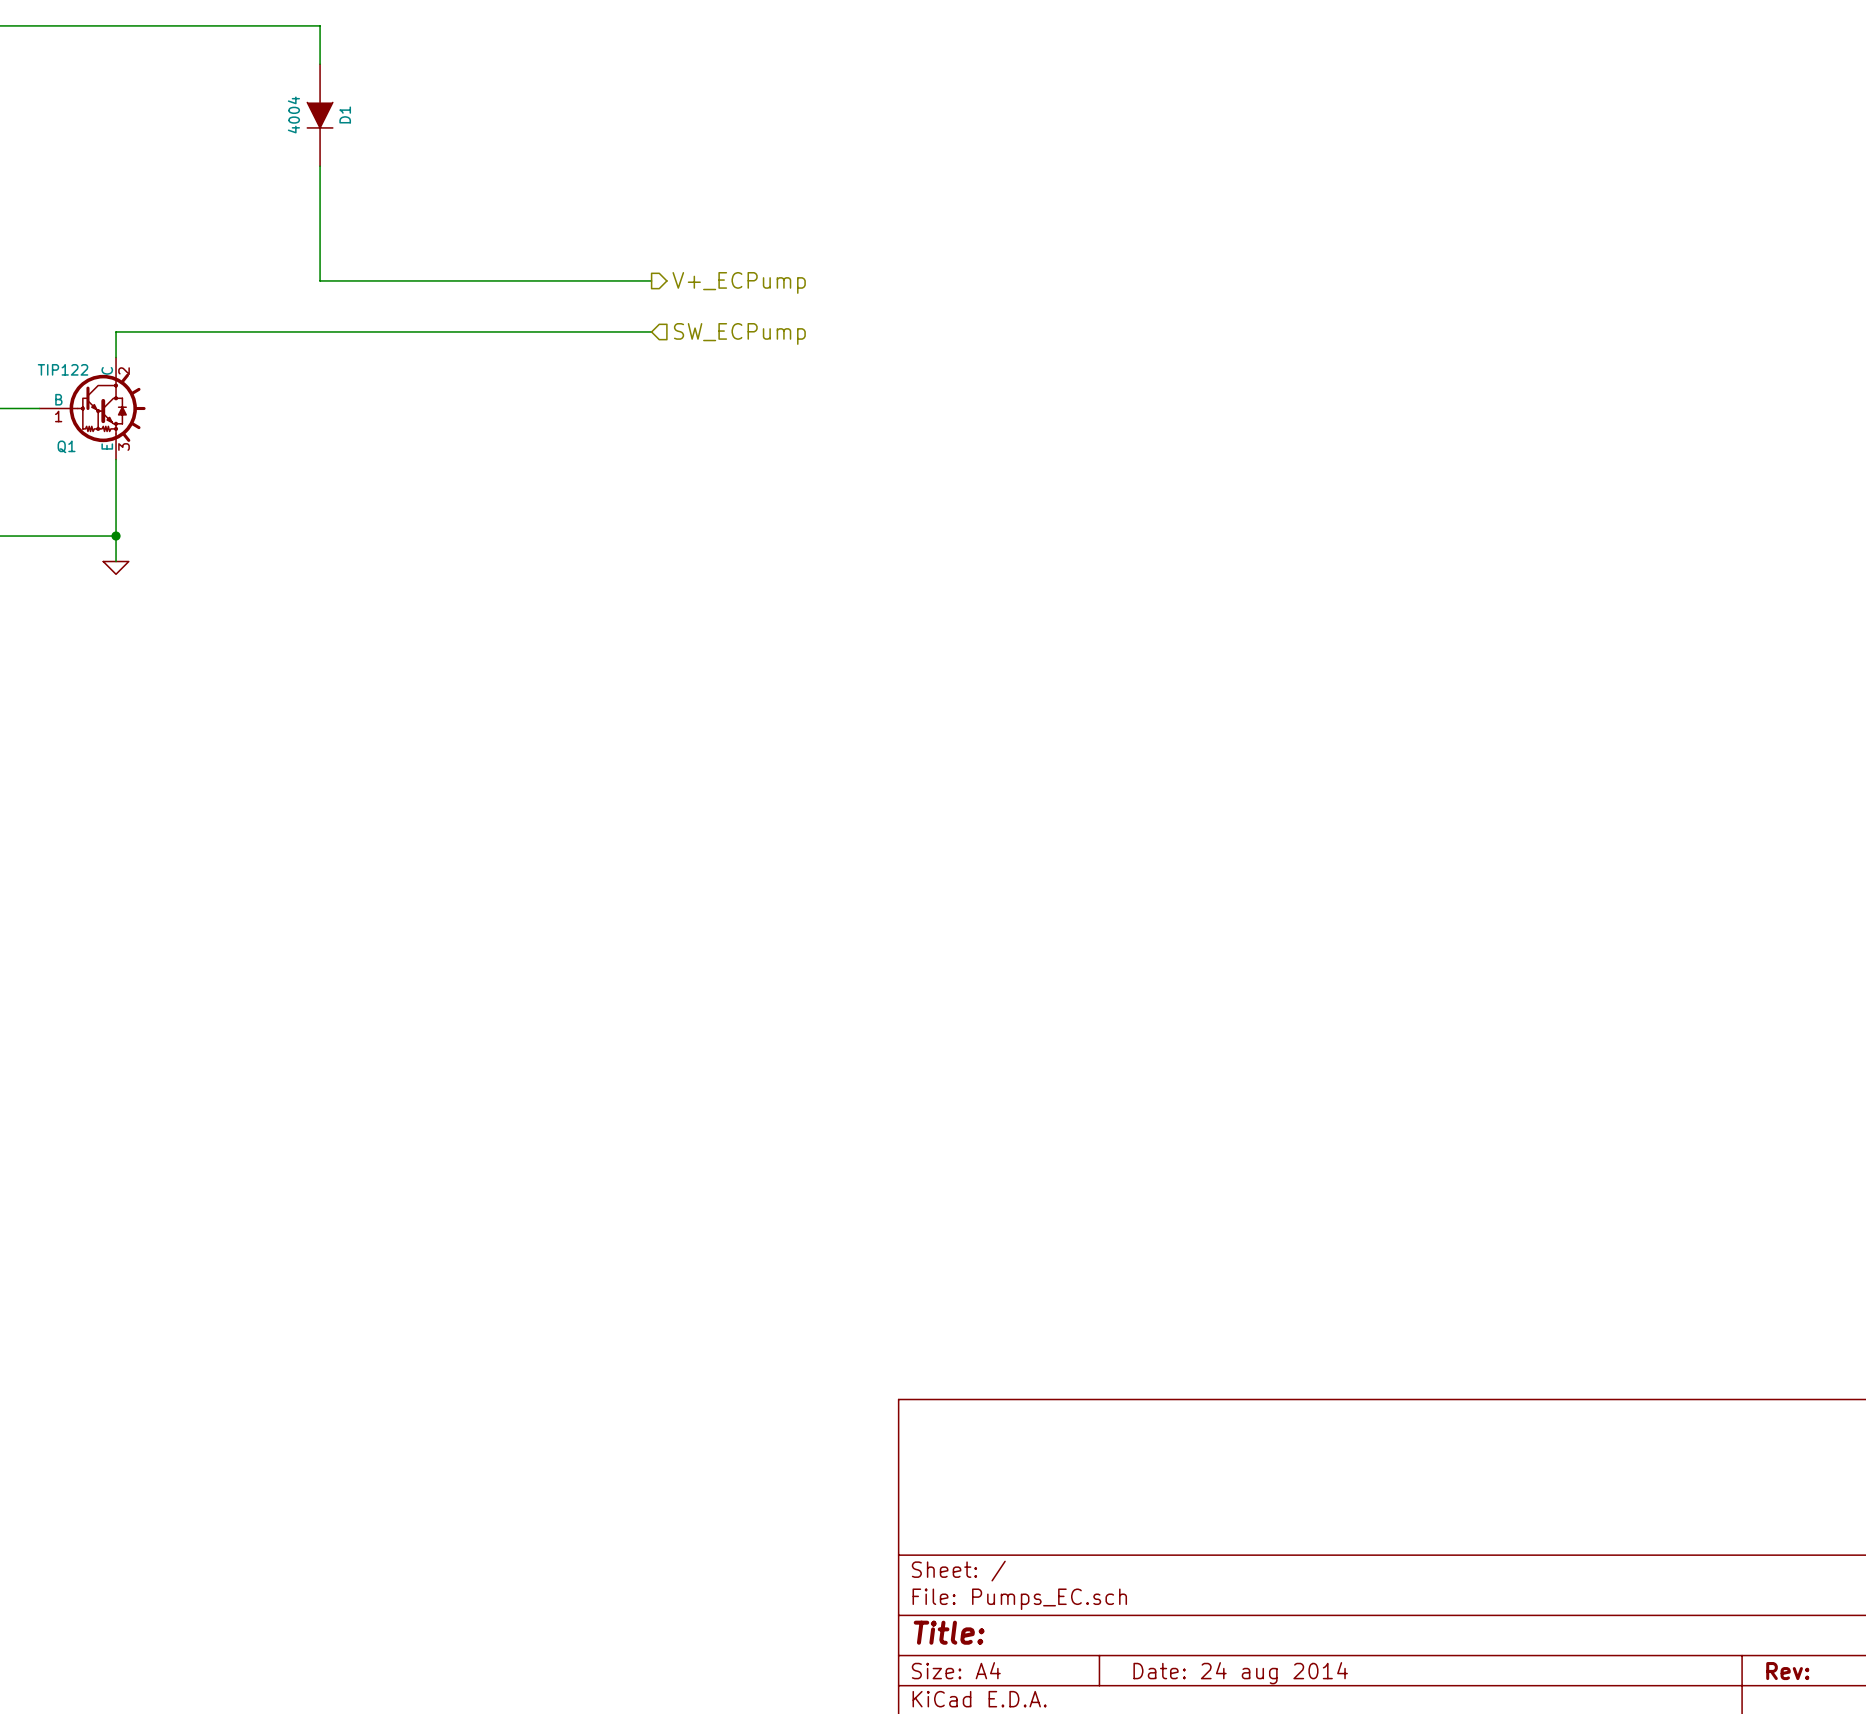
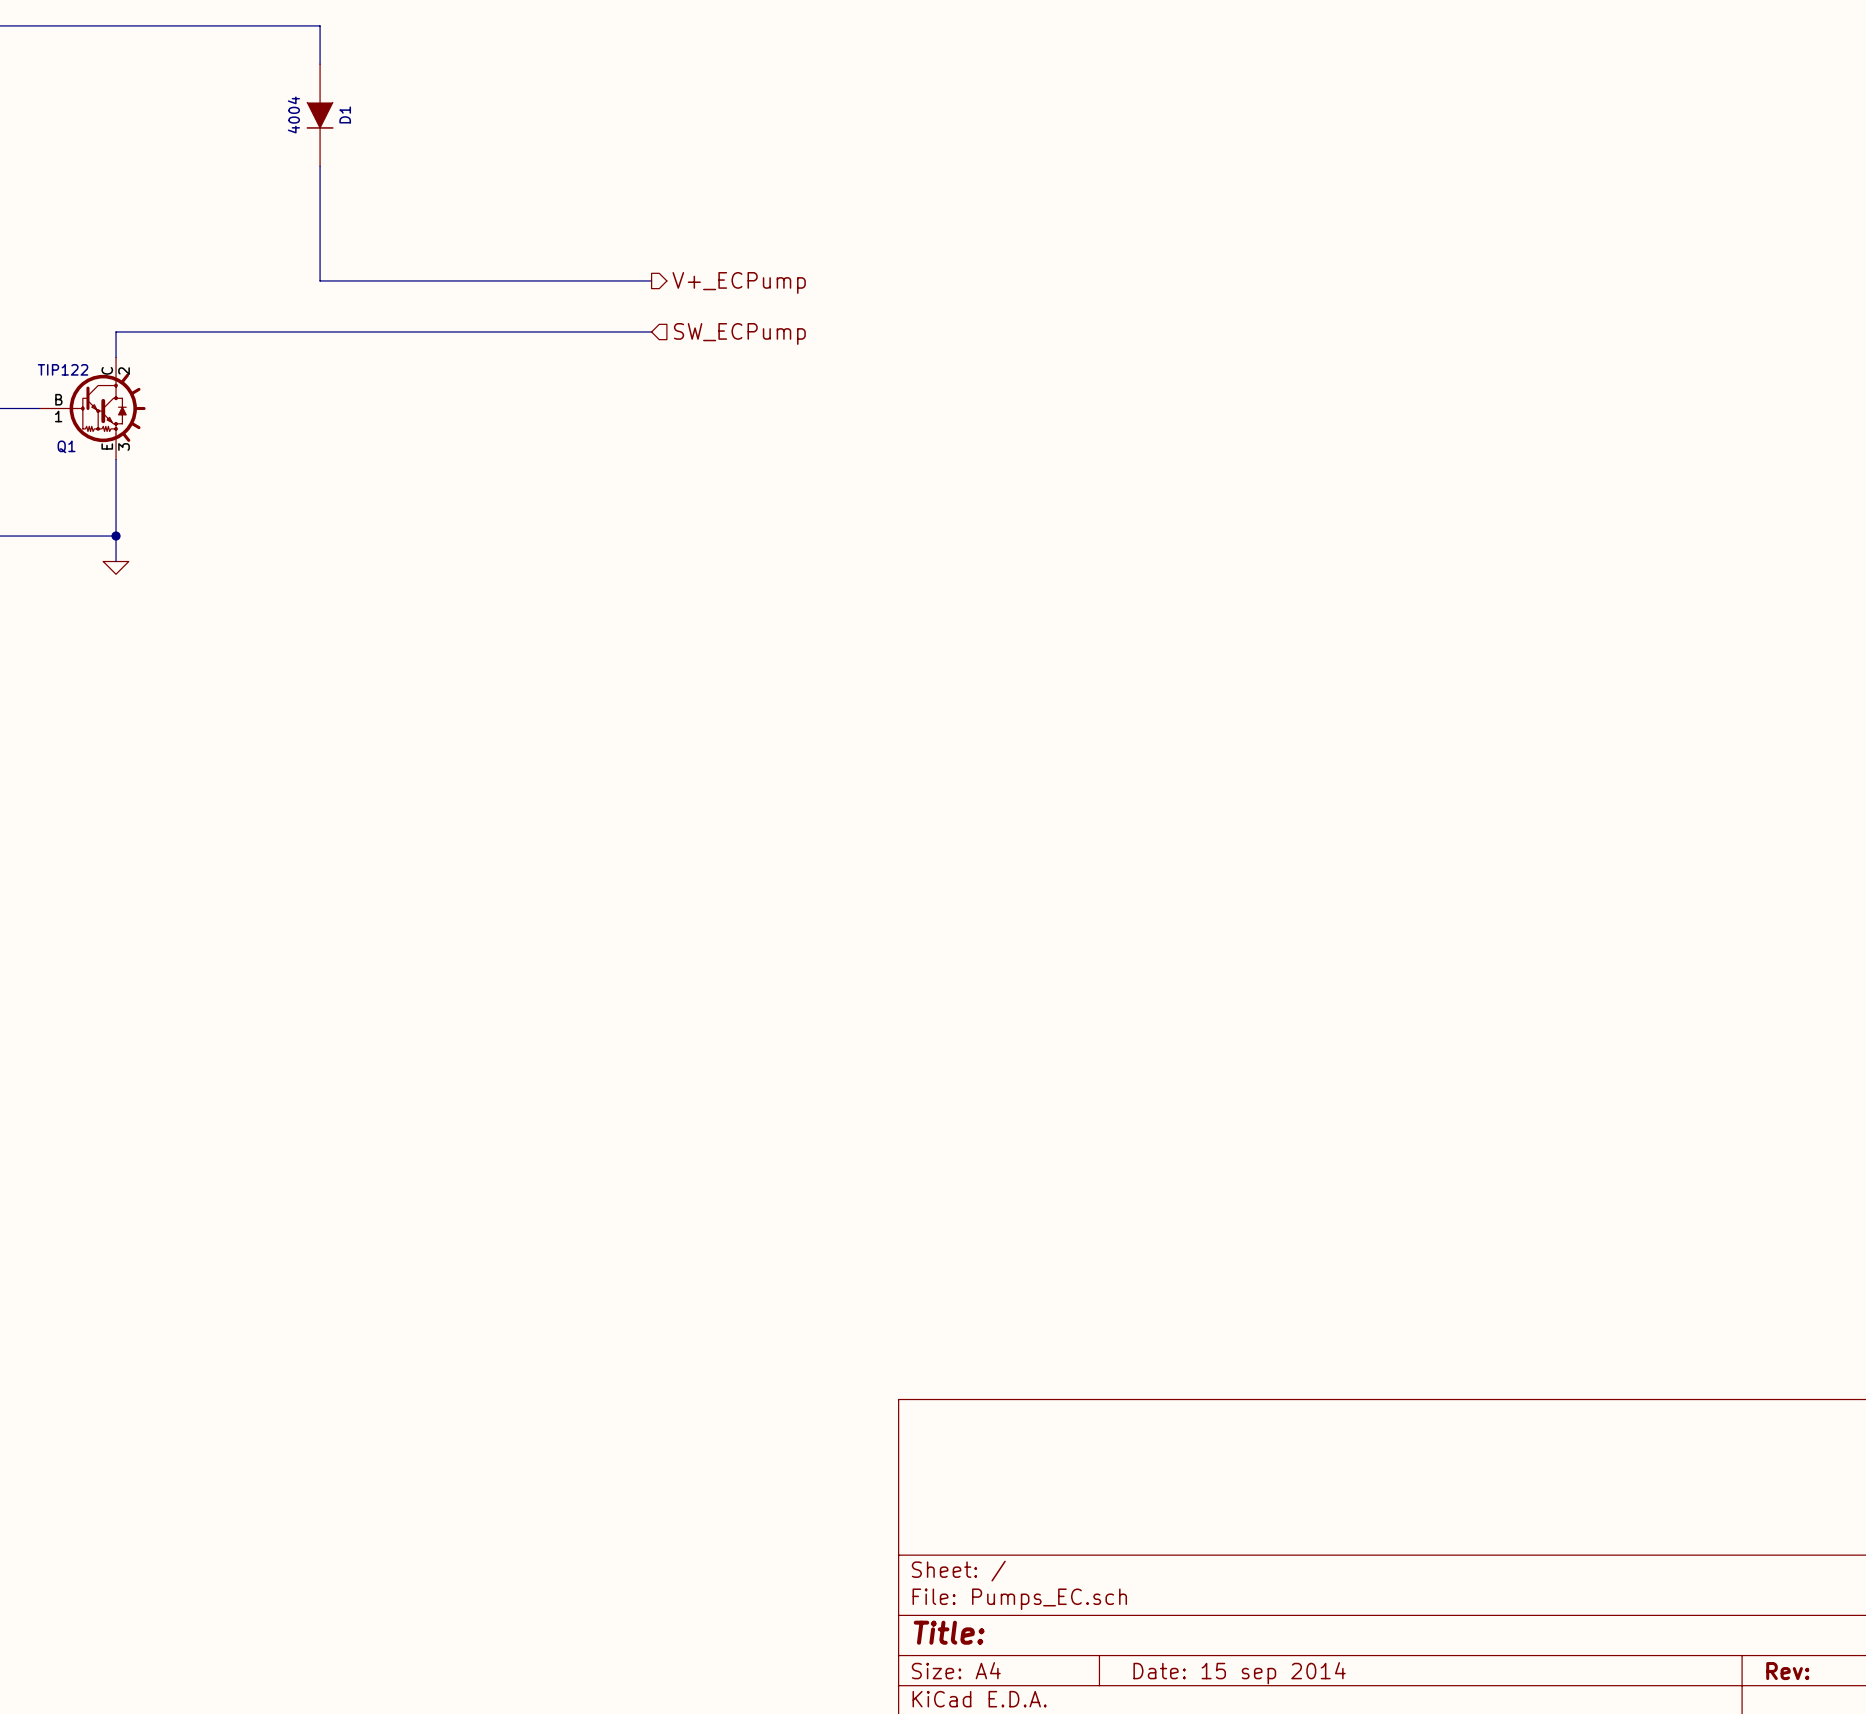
title block: Date: 24 aug 2014 (1240, 1673) -> Date: 15 sep 2014 (1239, 1673)

